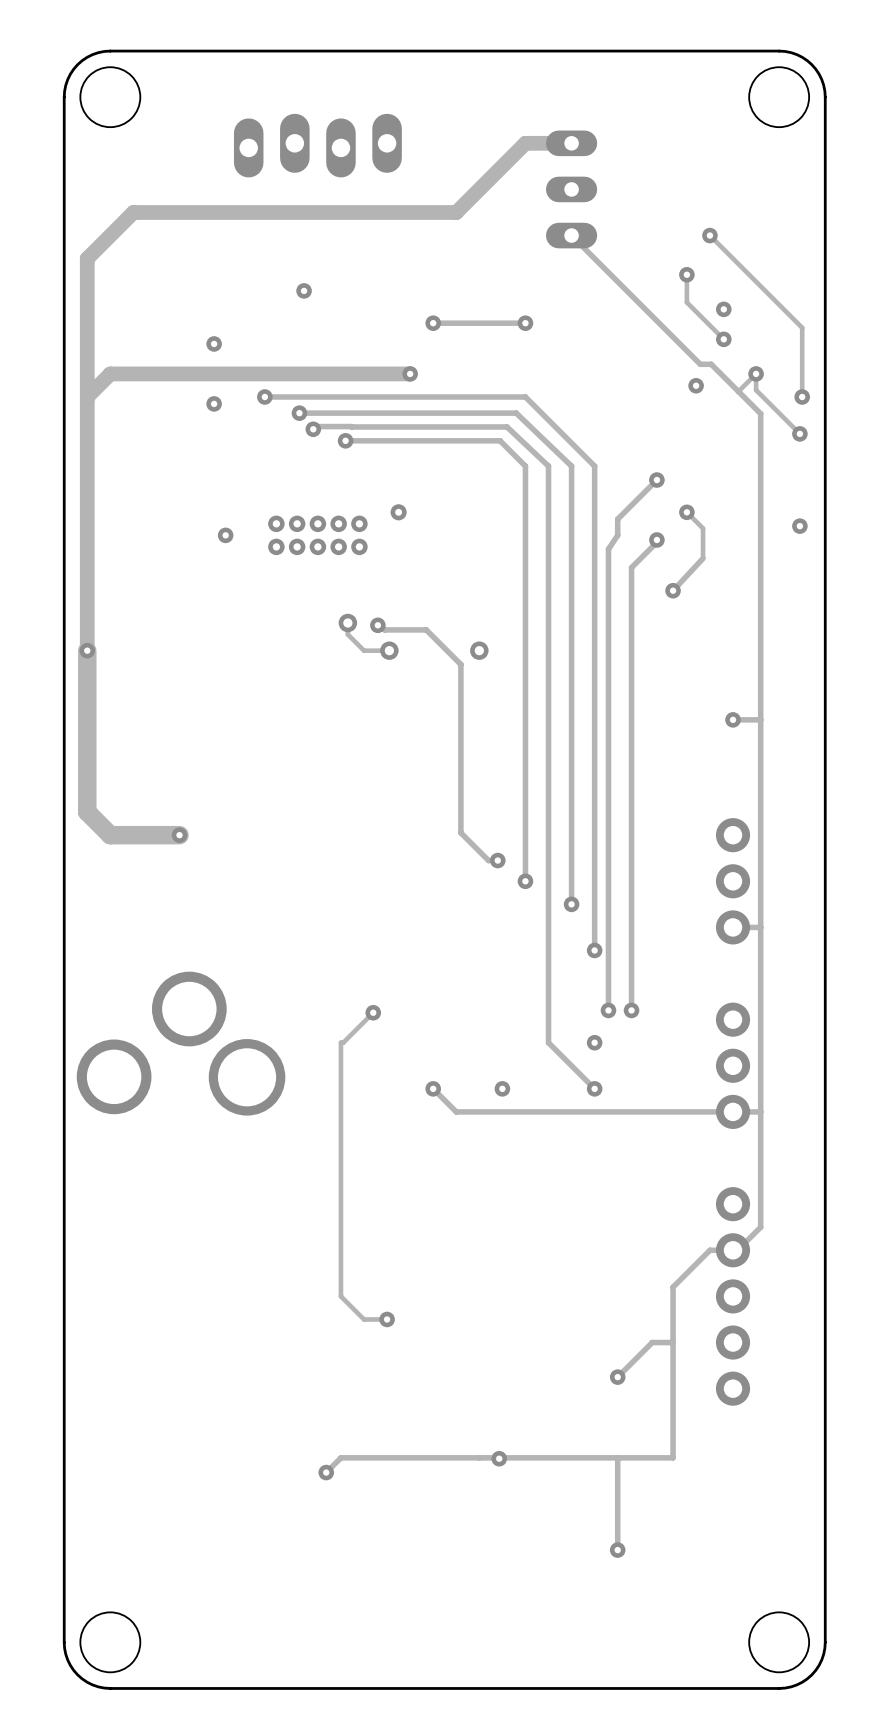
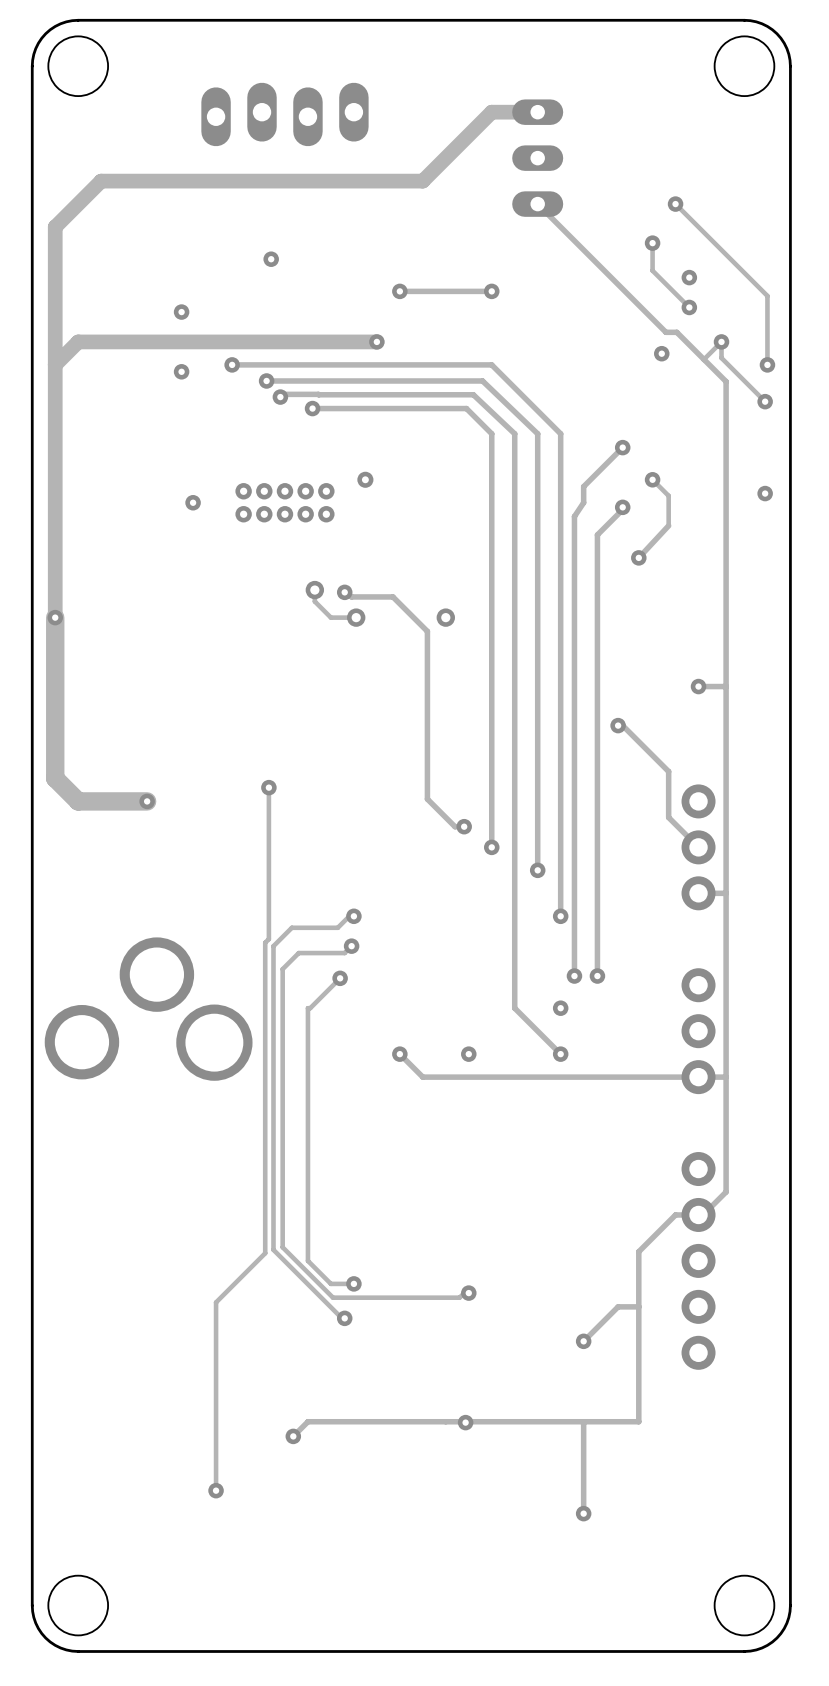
track: none -> (618, 725) (622, 725) (668, 771) (668, 817) (698, 847)
via: none -> (618, 725)
track: none -> (268, 787) (268, 939) (265, 942) (265, 1253) (216, 1302) (216, 1490)
via: none -> (268, 787)
track: none -> (353, 916) (349, 916) (337, 927) (291, 927) (273, 946) (273, 1249) (342, 1318) (344, 1318)
via: none -> (353, 916)
track: none -> (351, 946) (344, 953) (298, 953) (282, 969) (282, 1247) (333, 1297) (459, 1297) (468, 1288) (468, 1293)
via: none -> (351, 946)
via: none -> (468, 1293)
via: none -> (344, 1318)
via: none -> (216, 1490)

